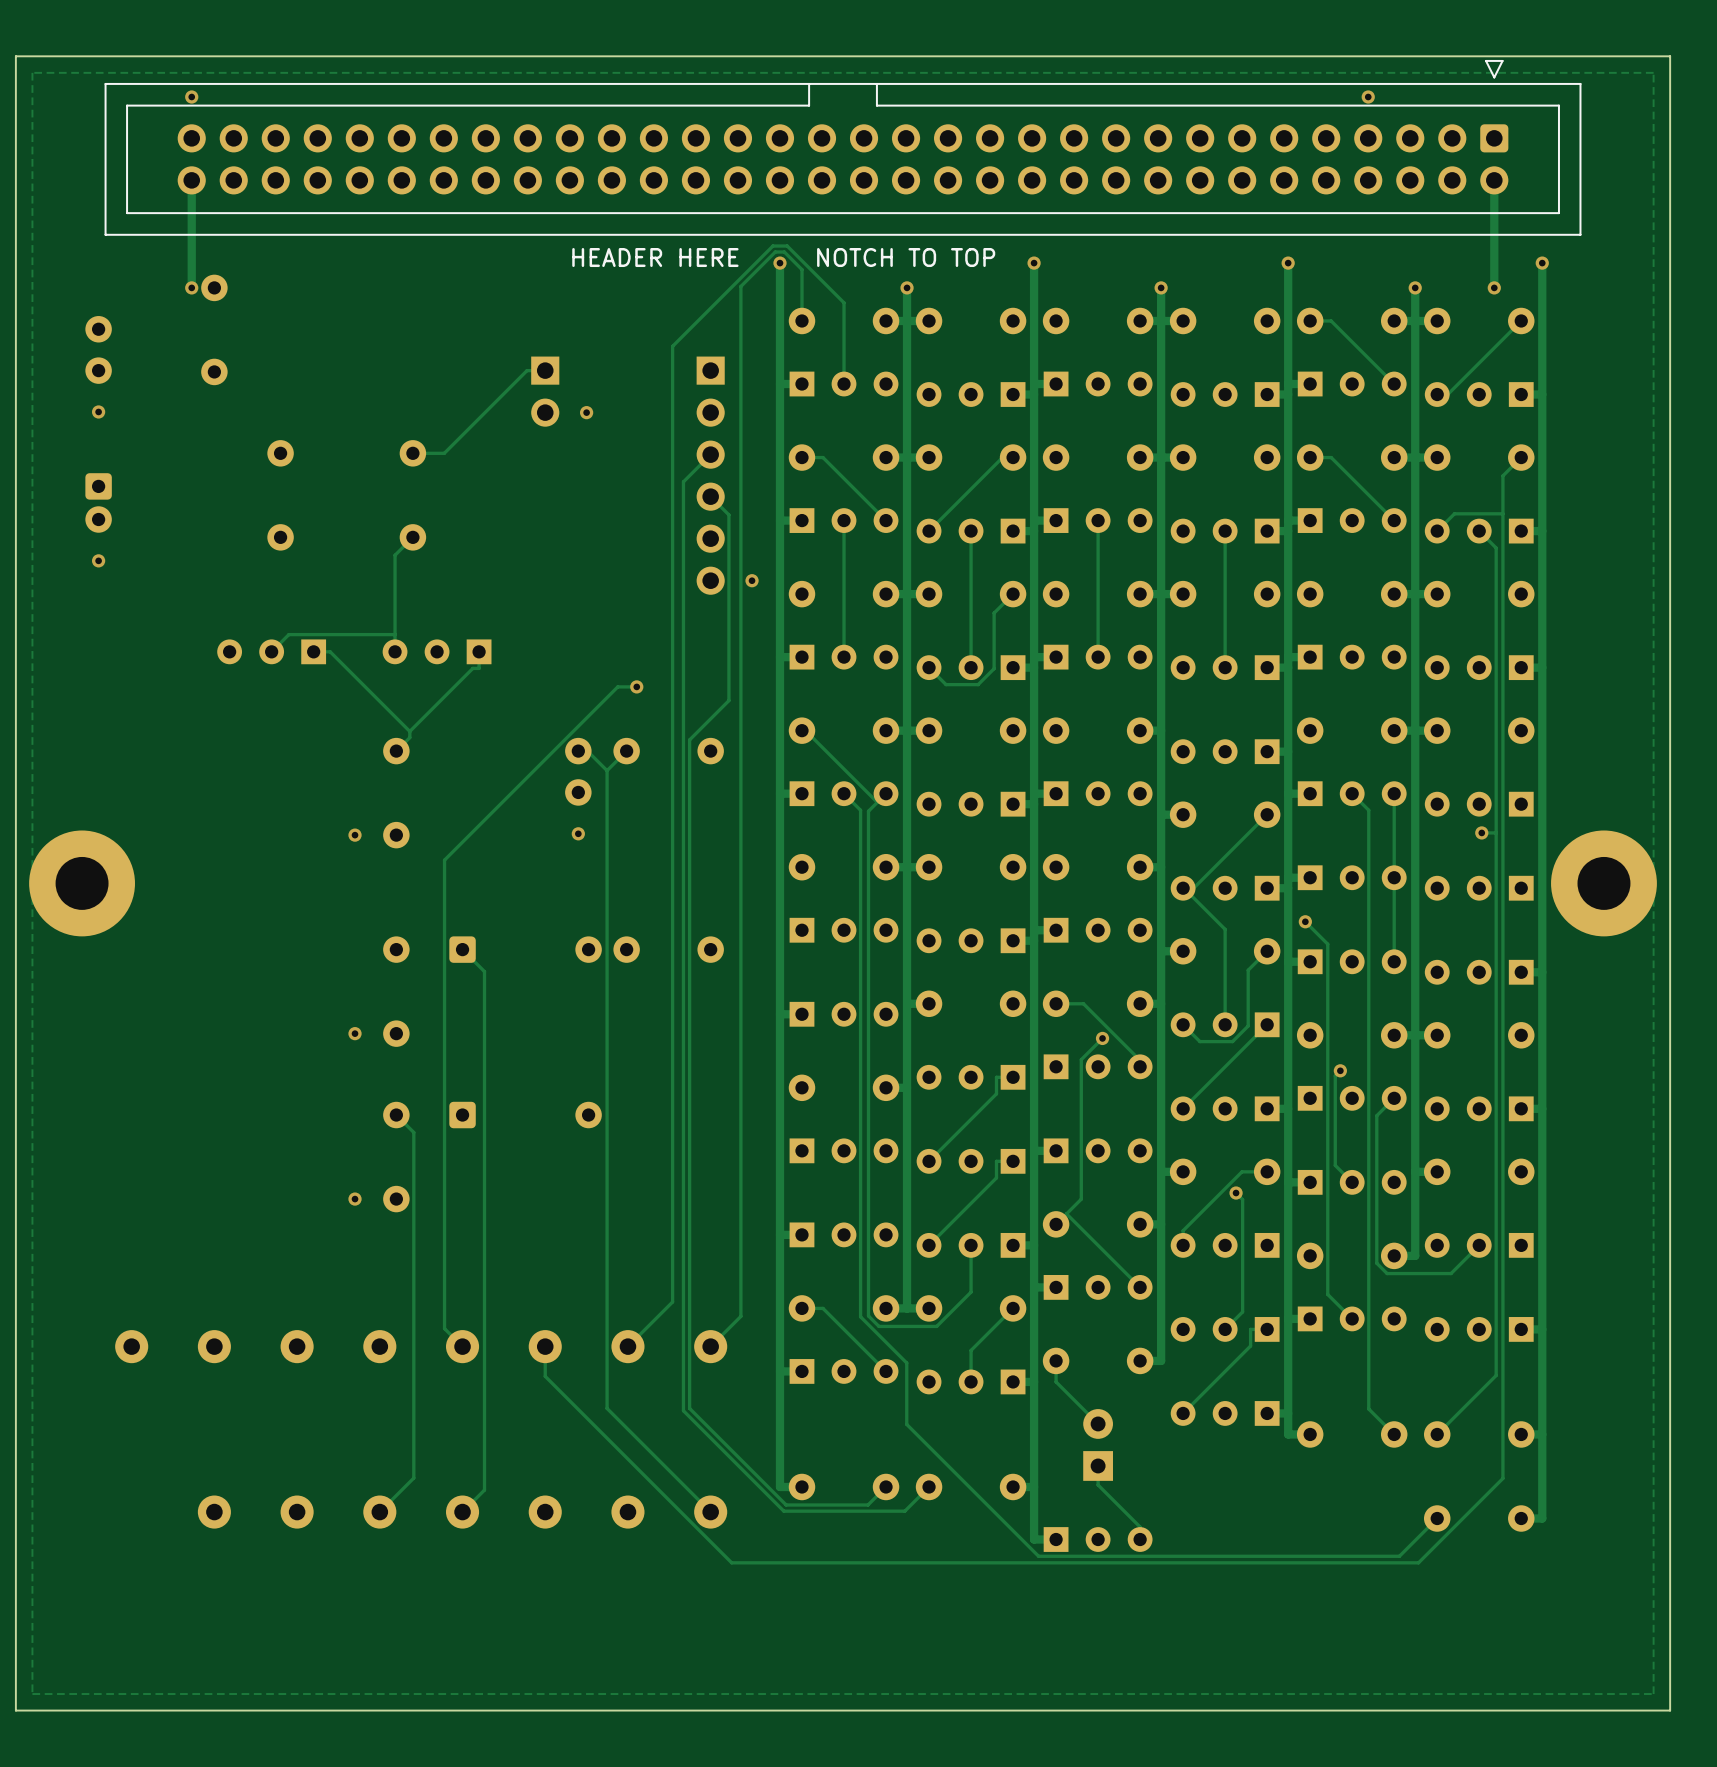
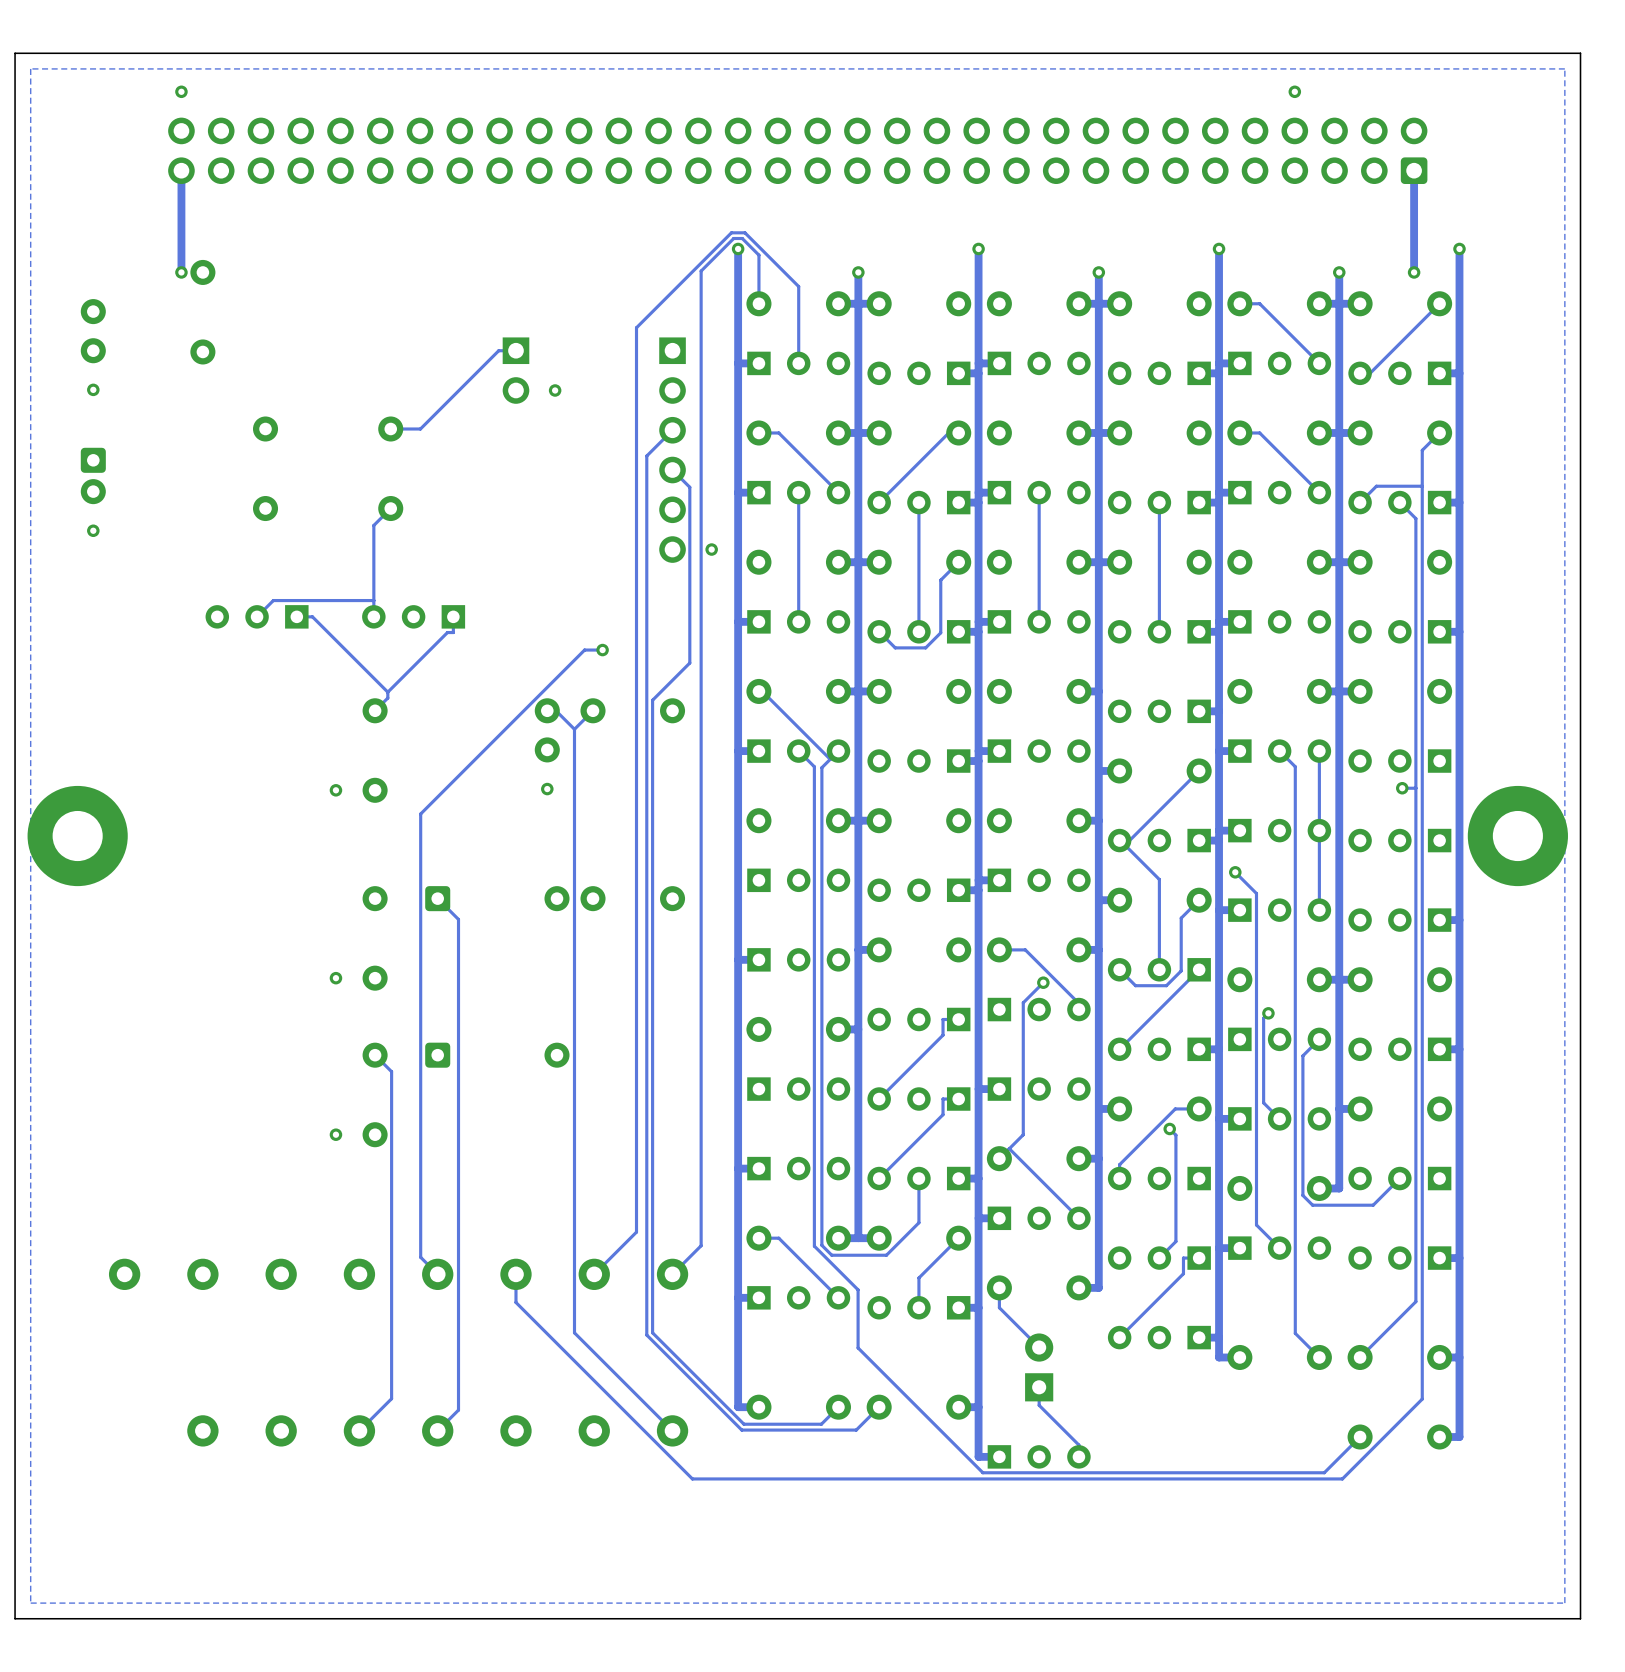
part side: bottom (843, 147) -> top (797, 150)
text: HEADER HERE (655, 257) -> none
text: NOTCH TO TOP (906, 257) -> none

